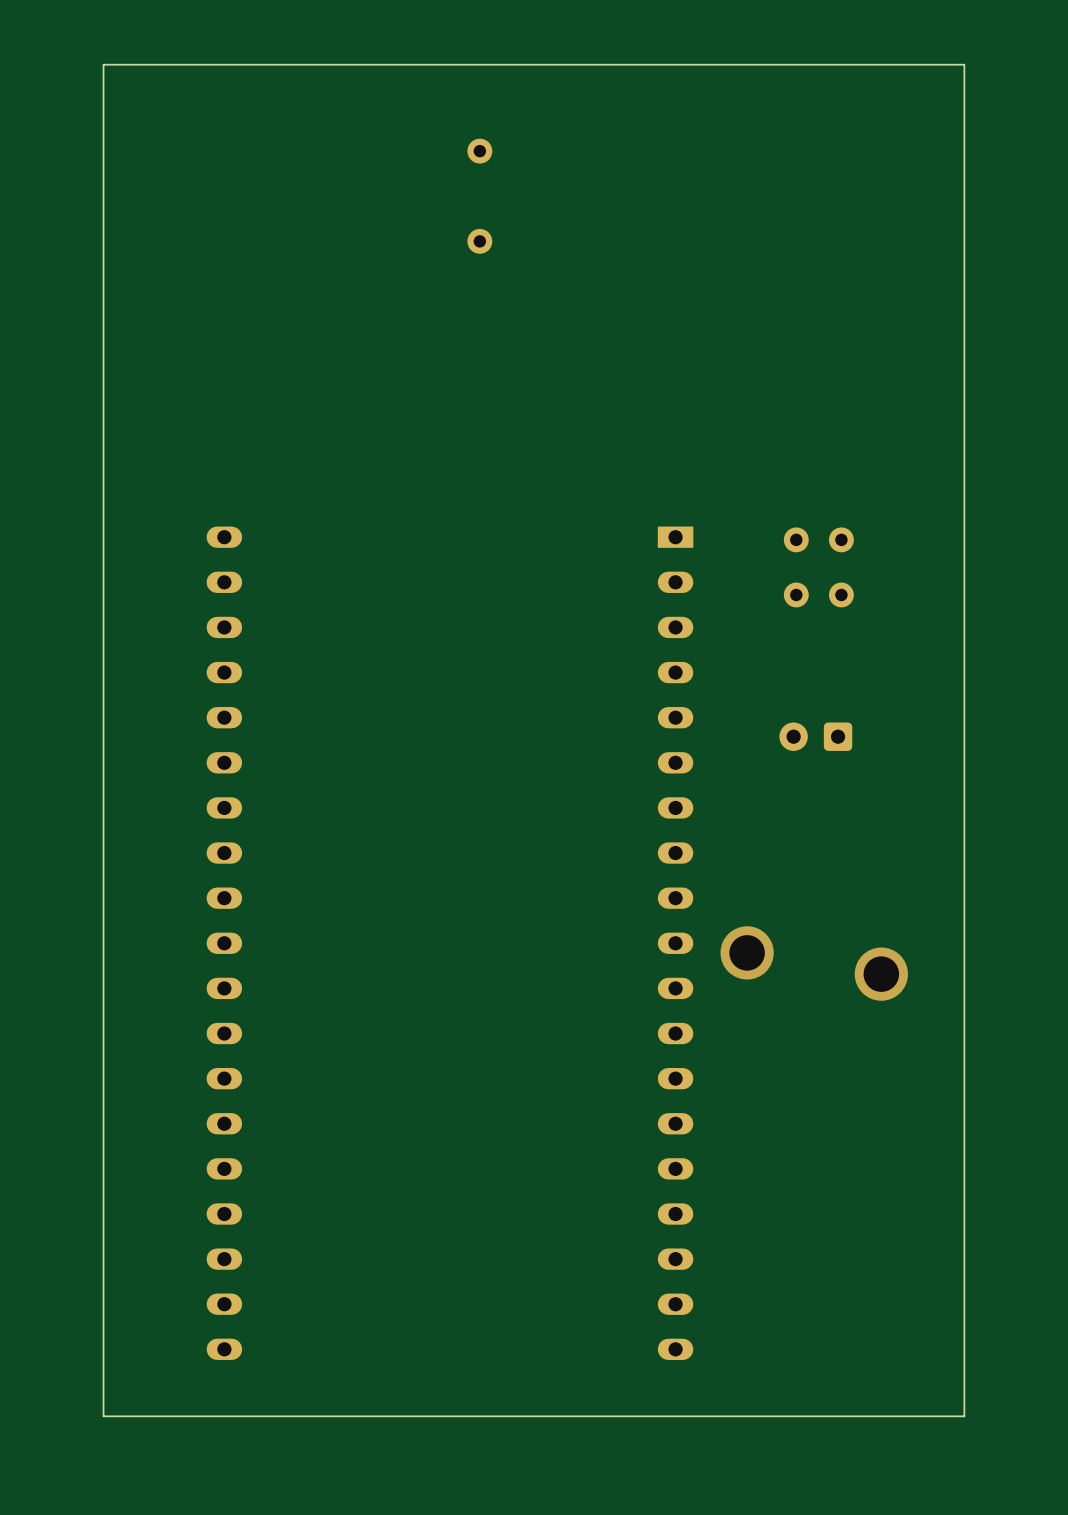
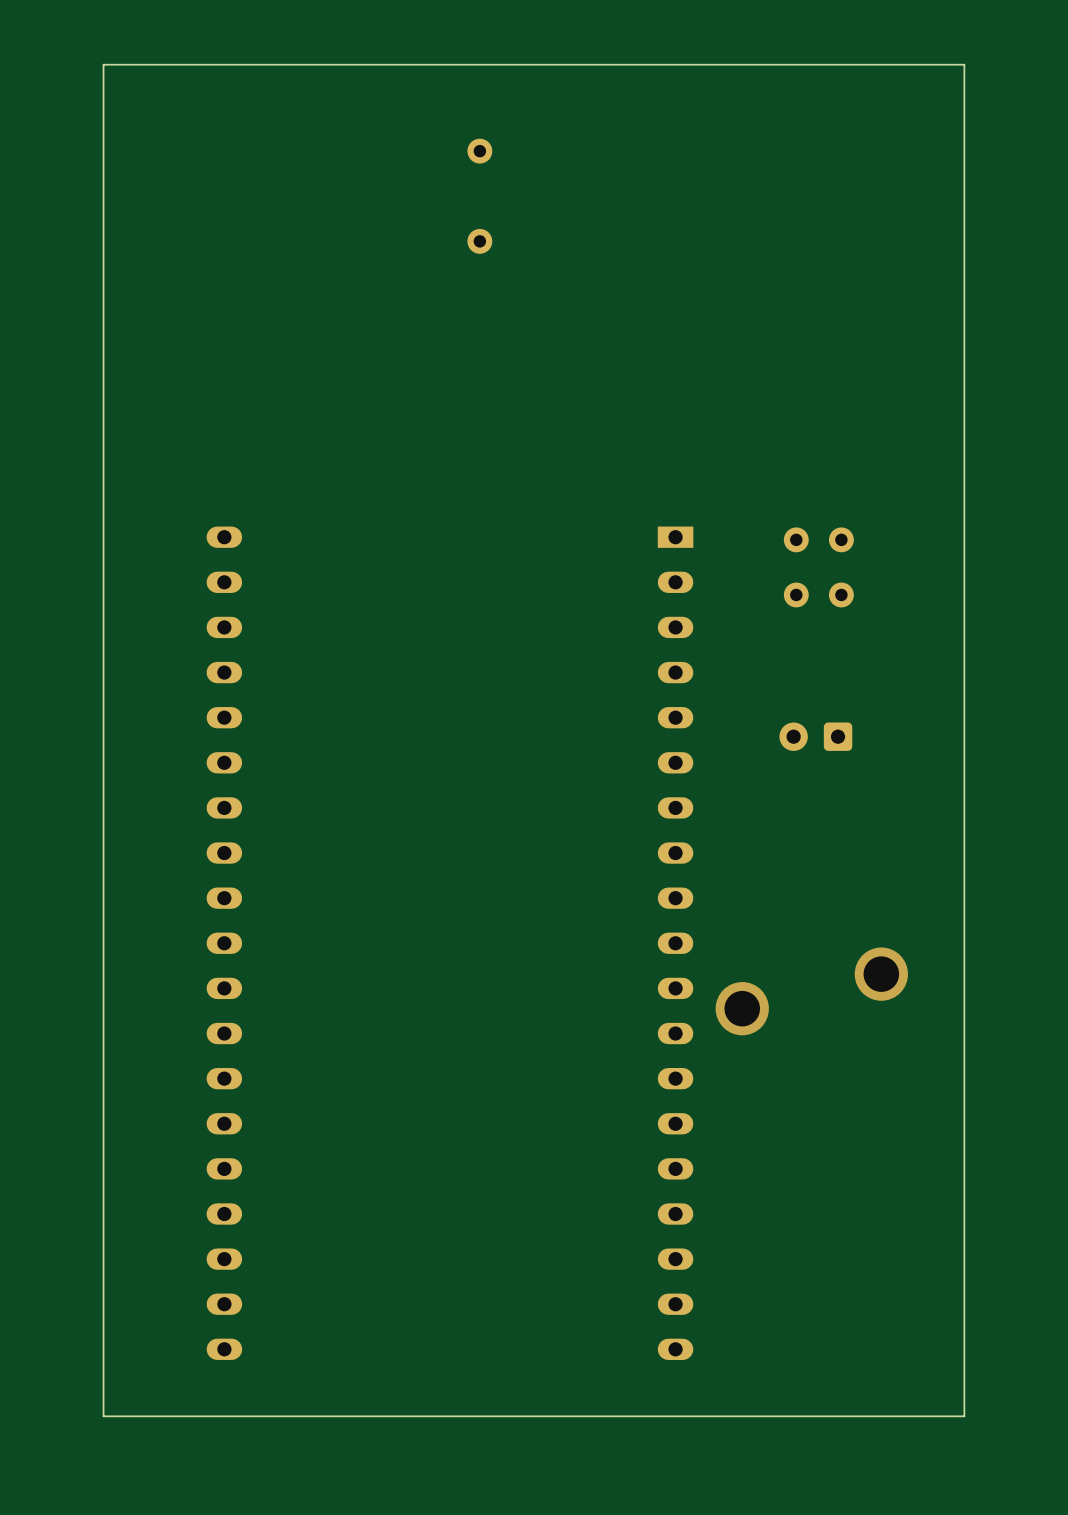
via position: (747, 952) -> (742, 1008)

